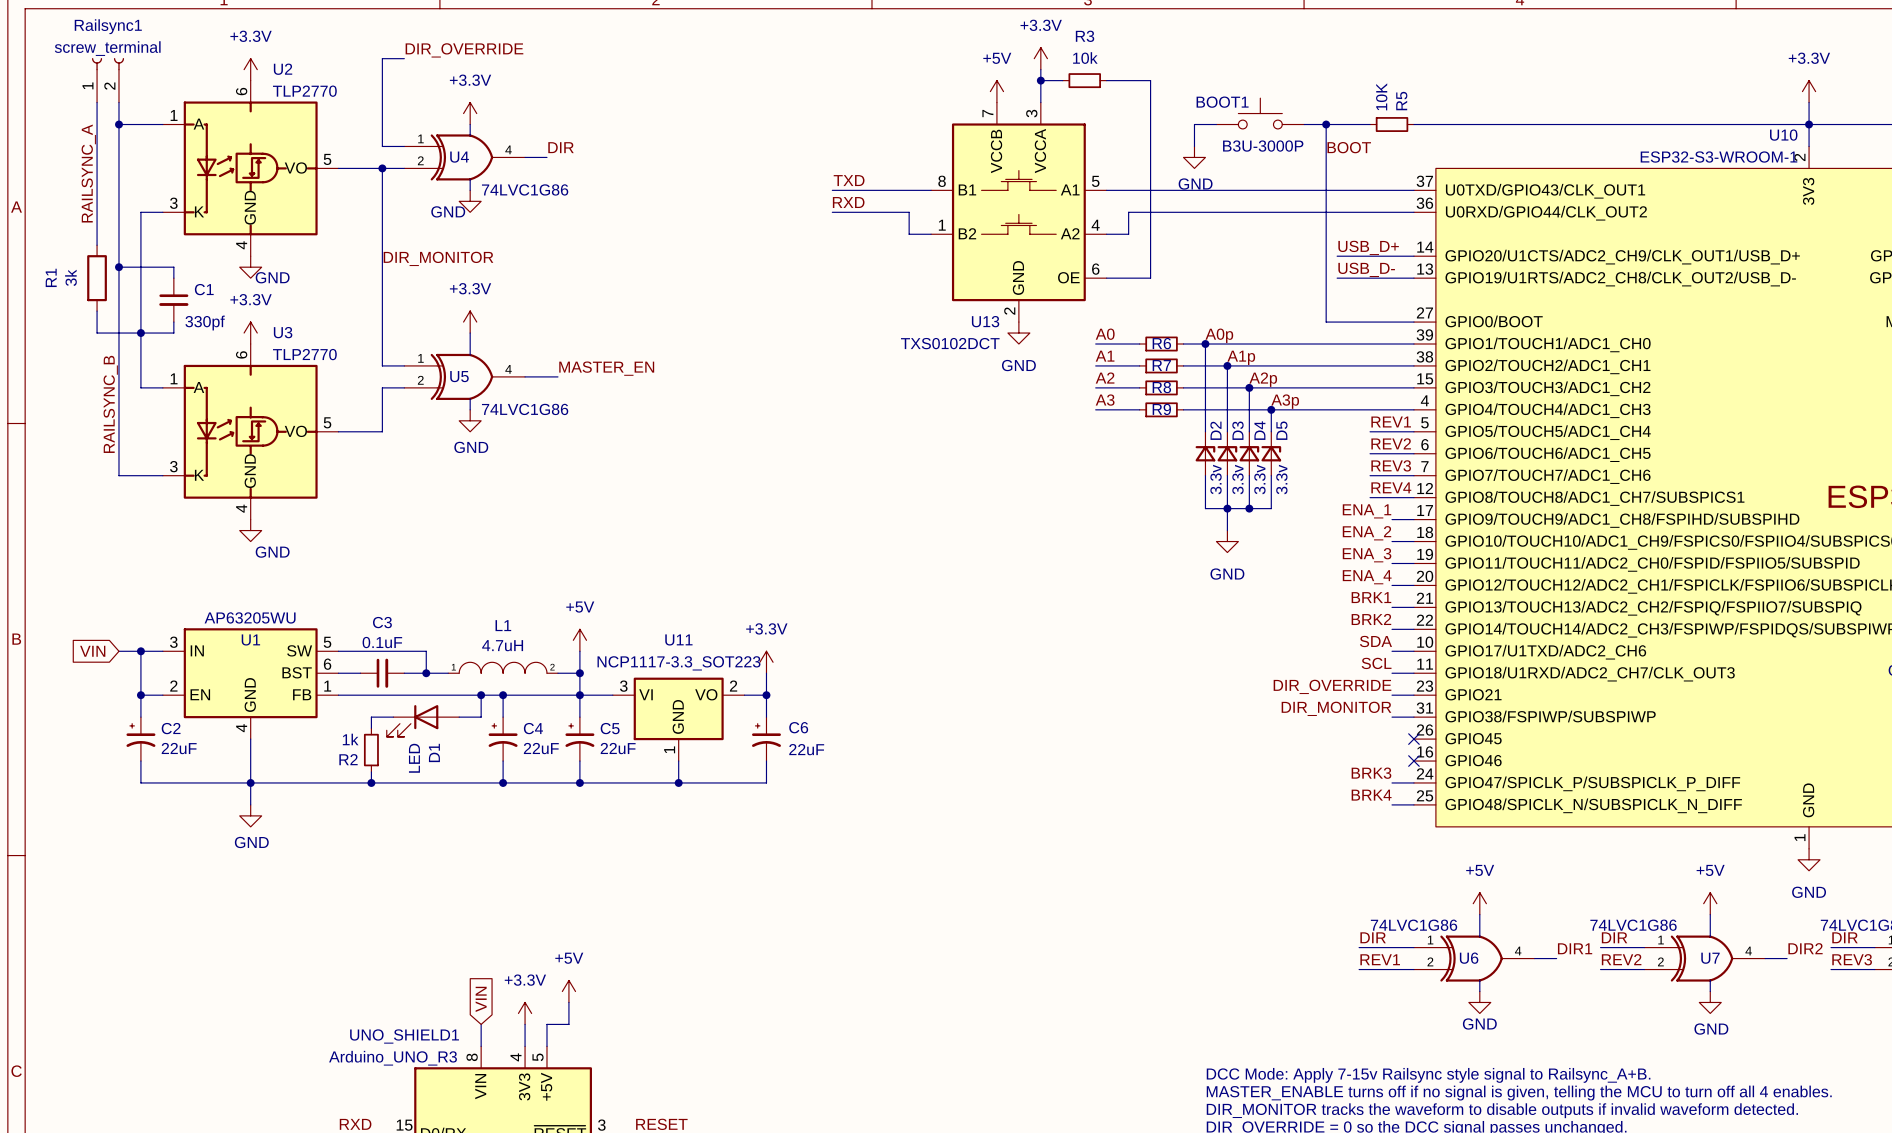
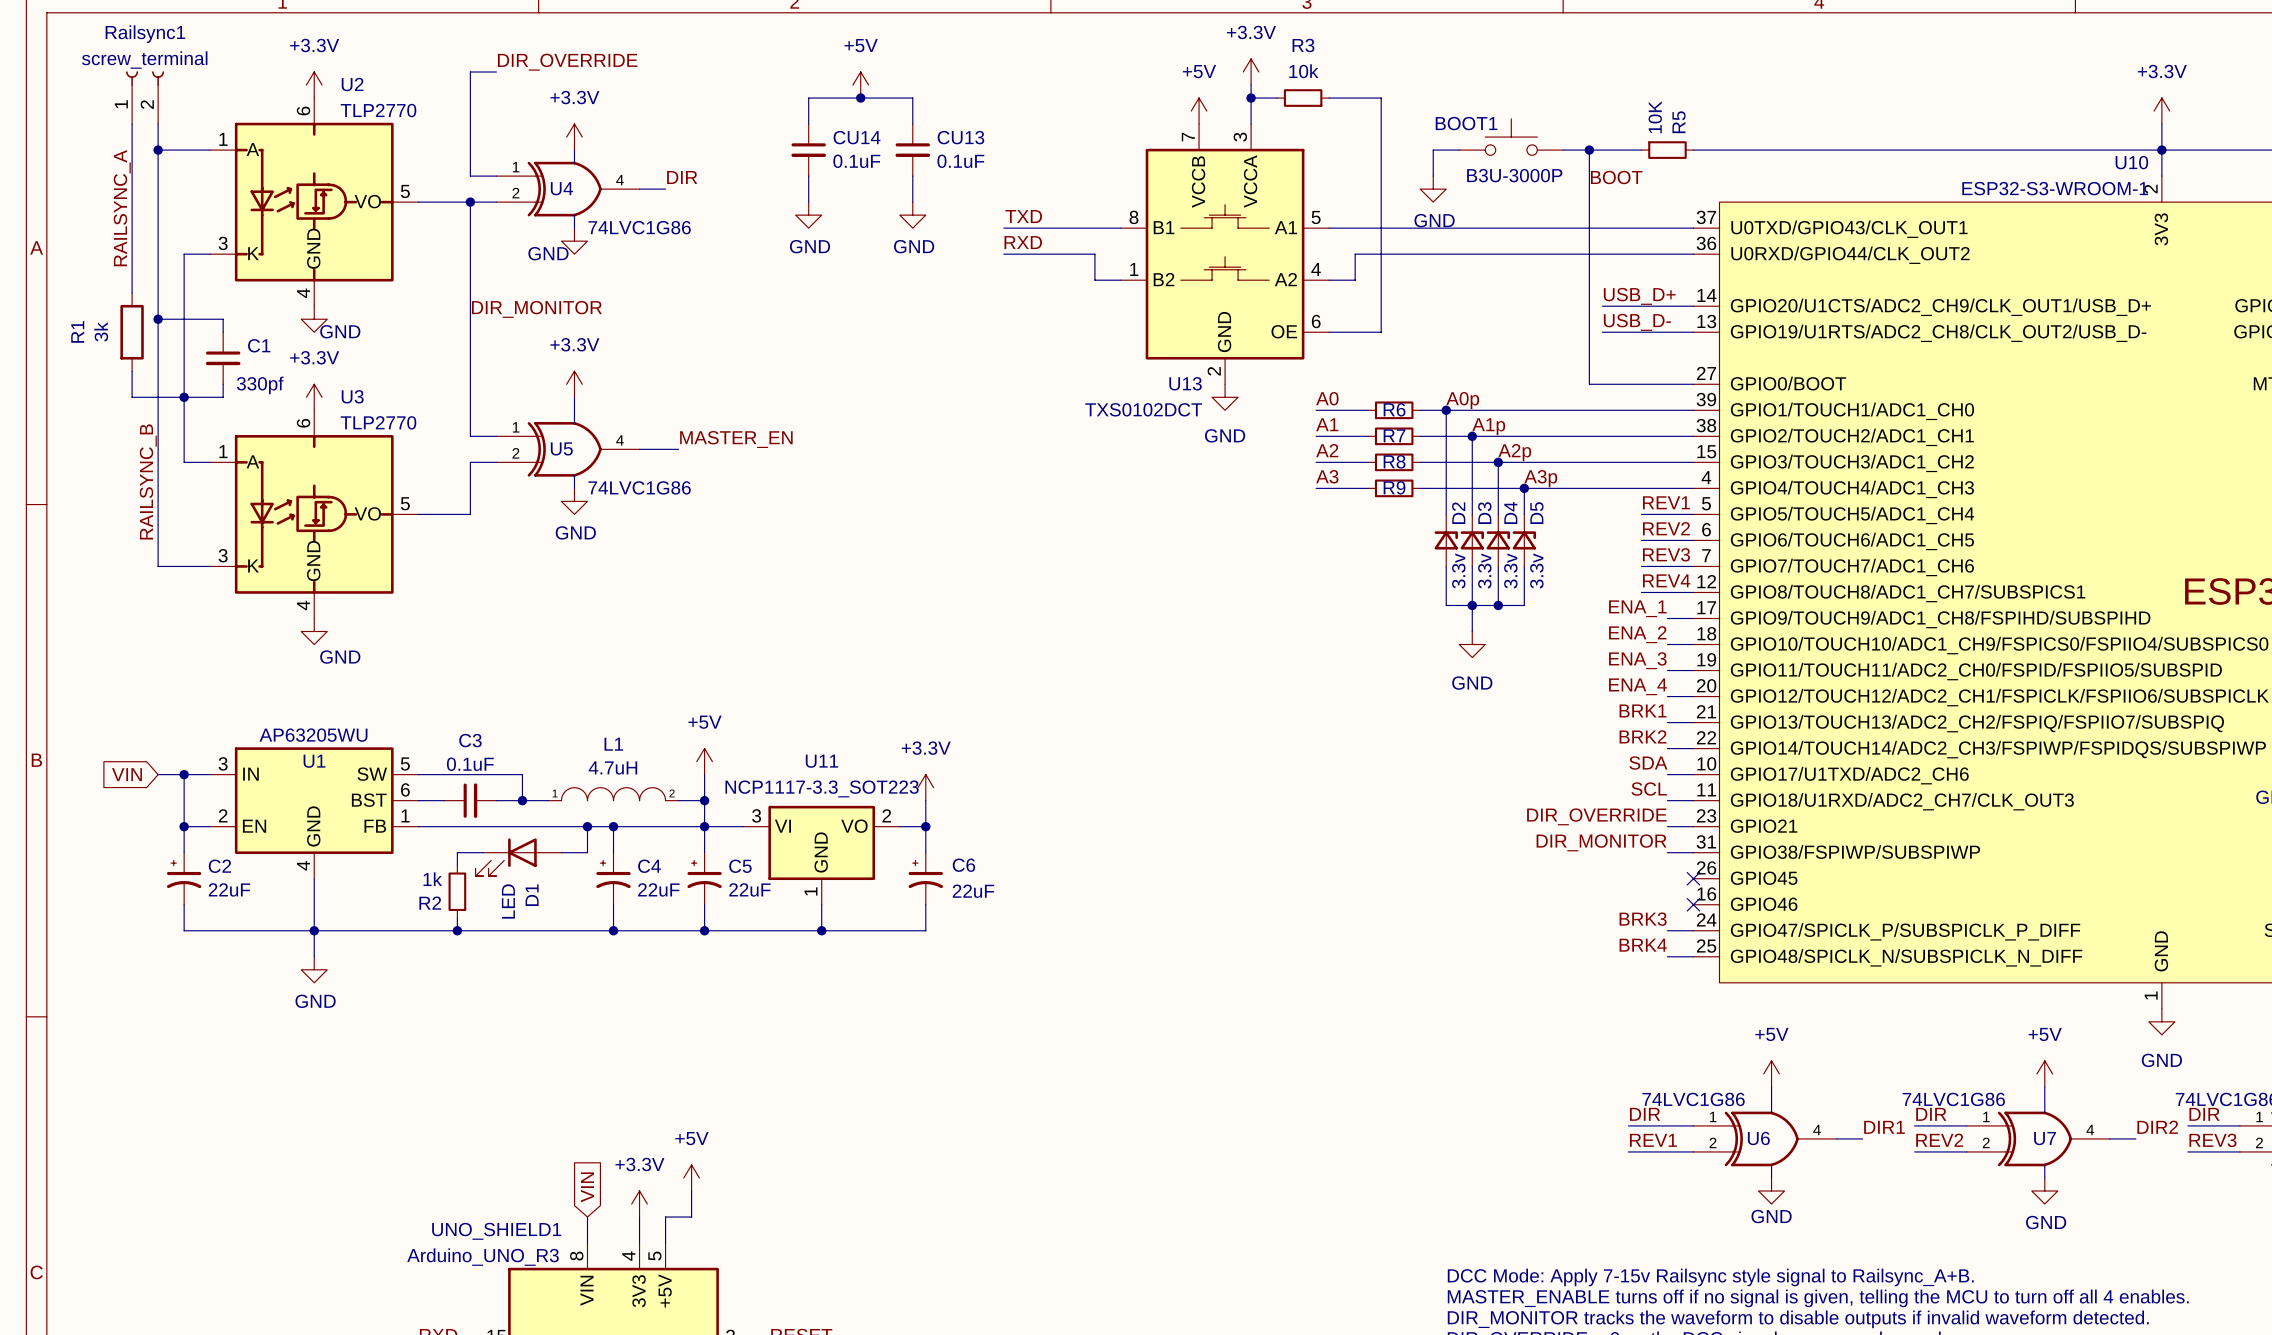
power symbol: none -> +5V (860, 85)
junction: none -> (860, 98)
wire: none -> (808, 124) (808, 98) (912, 98) (912, 124)
CU14: none -> 0.1uF (808, 150)
CU13: none -> 0.1uF (912, 150)
wire: none -> (808, 176) (808, 202)
wire: none -> (912, 176) (912, 202)
power symbol: none -> GND (808, 215)
power symbol: none -> GND (912, 215)

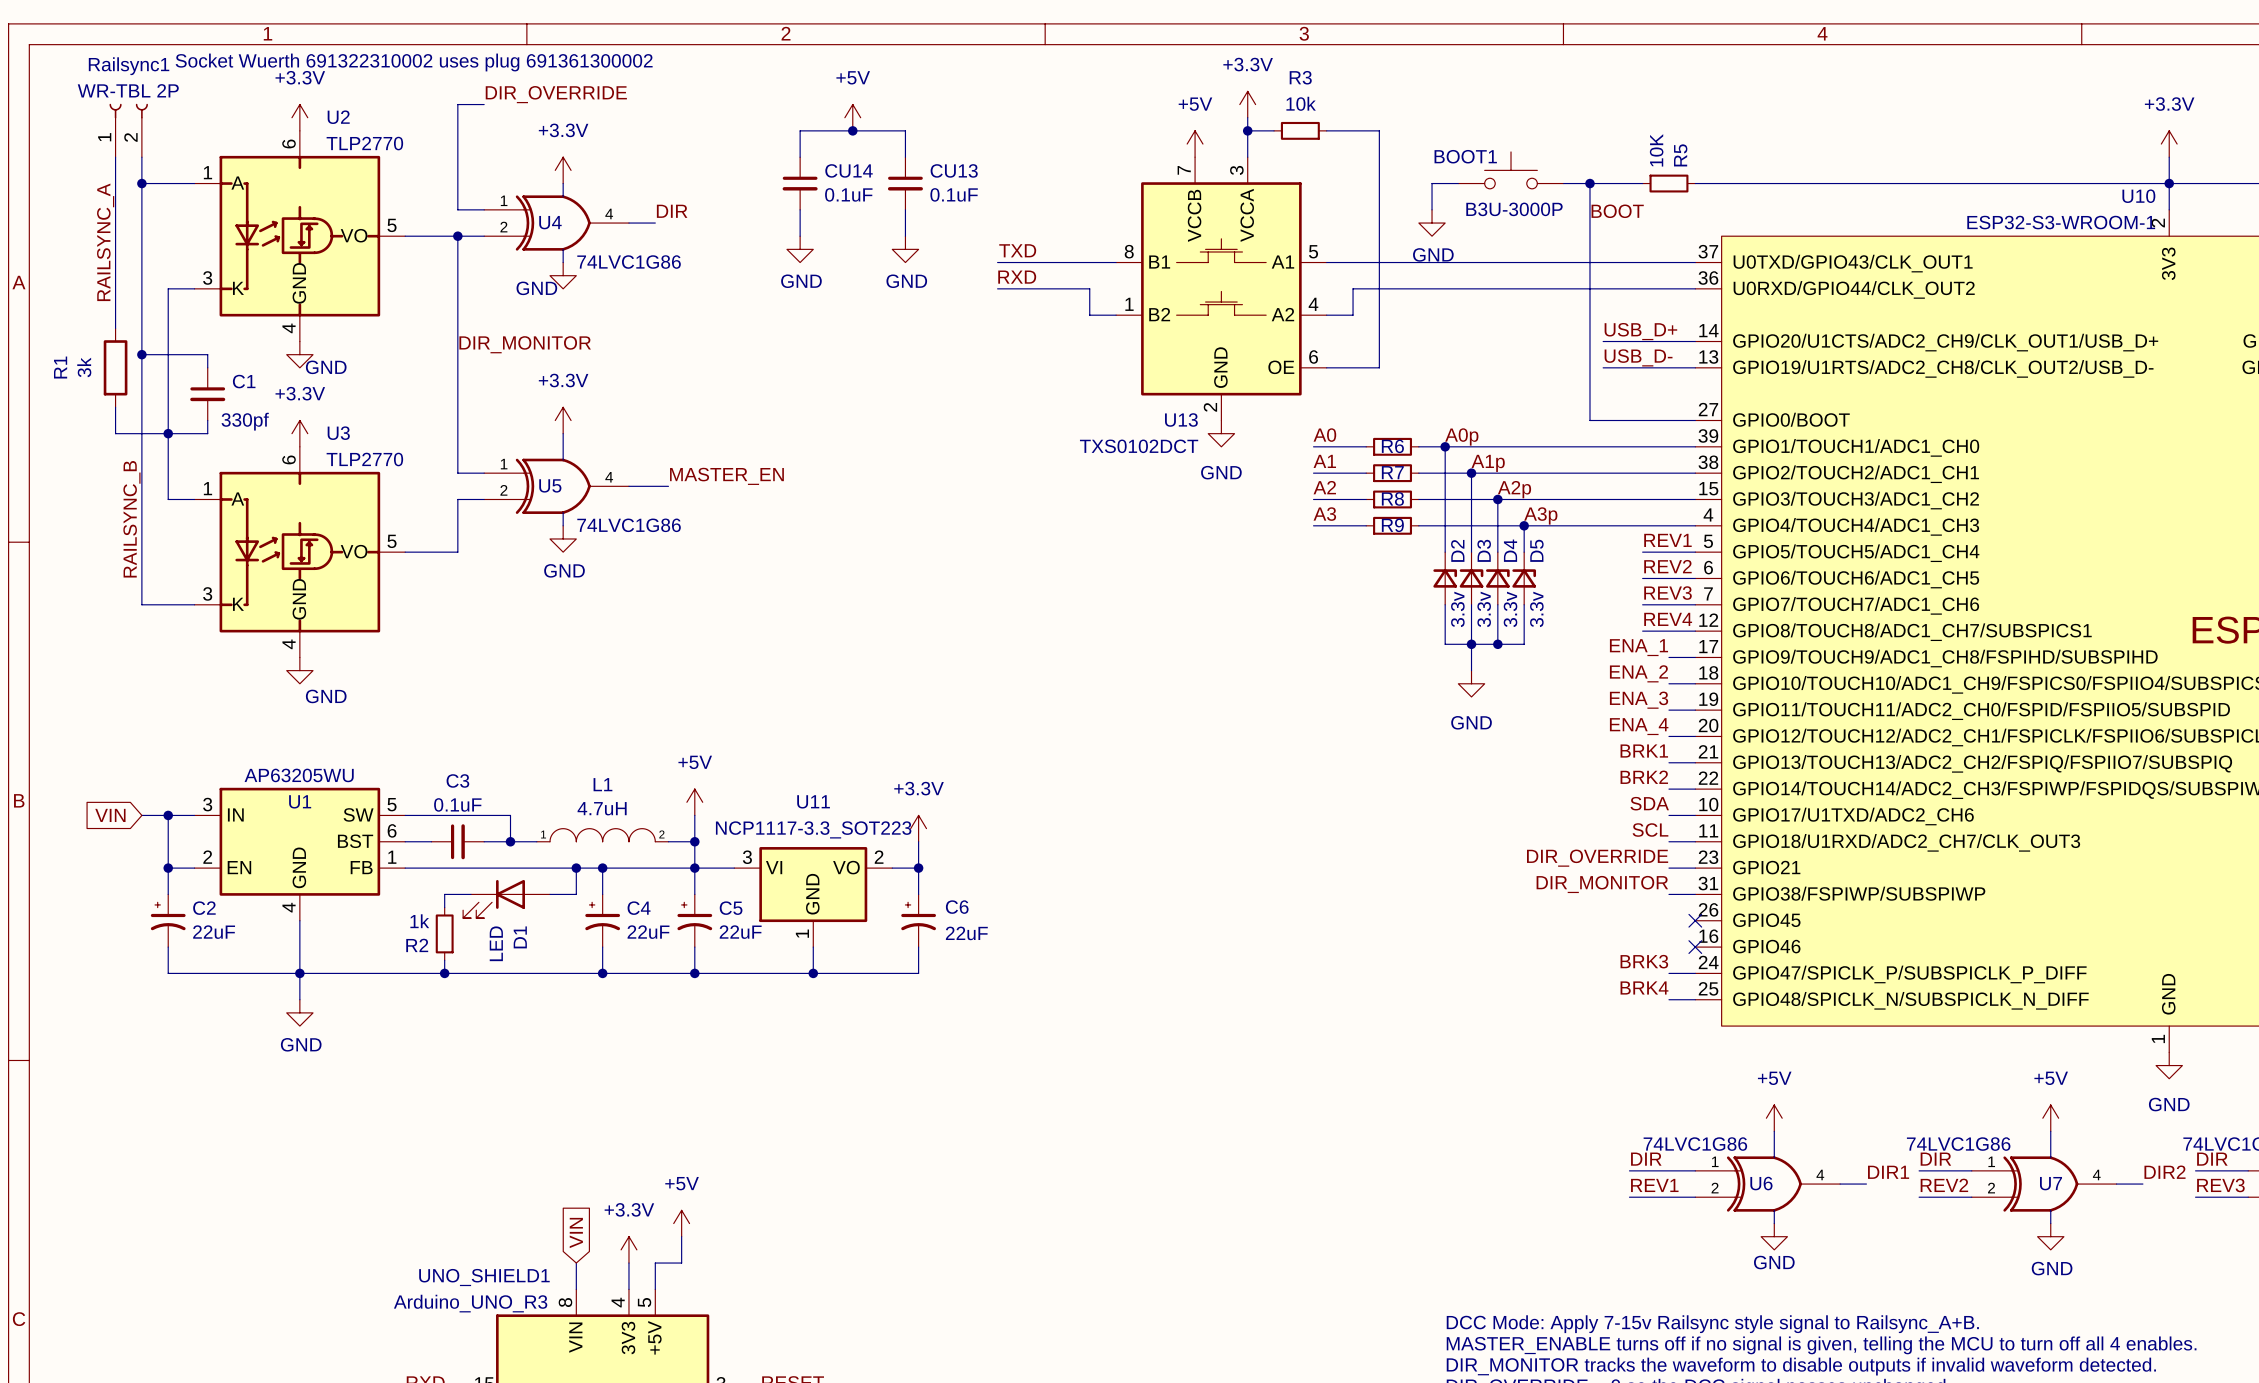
text: none -> Socket Wuerth 691322310002 uses plug 691361300002 (414, 62)
Railsync1 value: screw_terminal (144, 60) -> WR-TBL 2P (128, 90)

